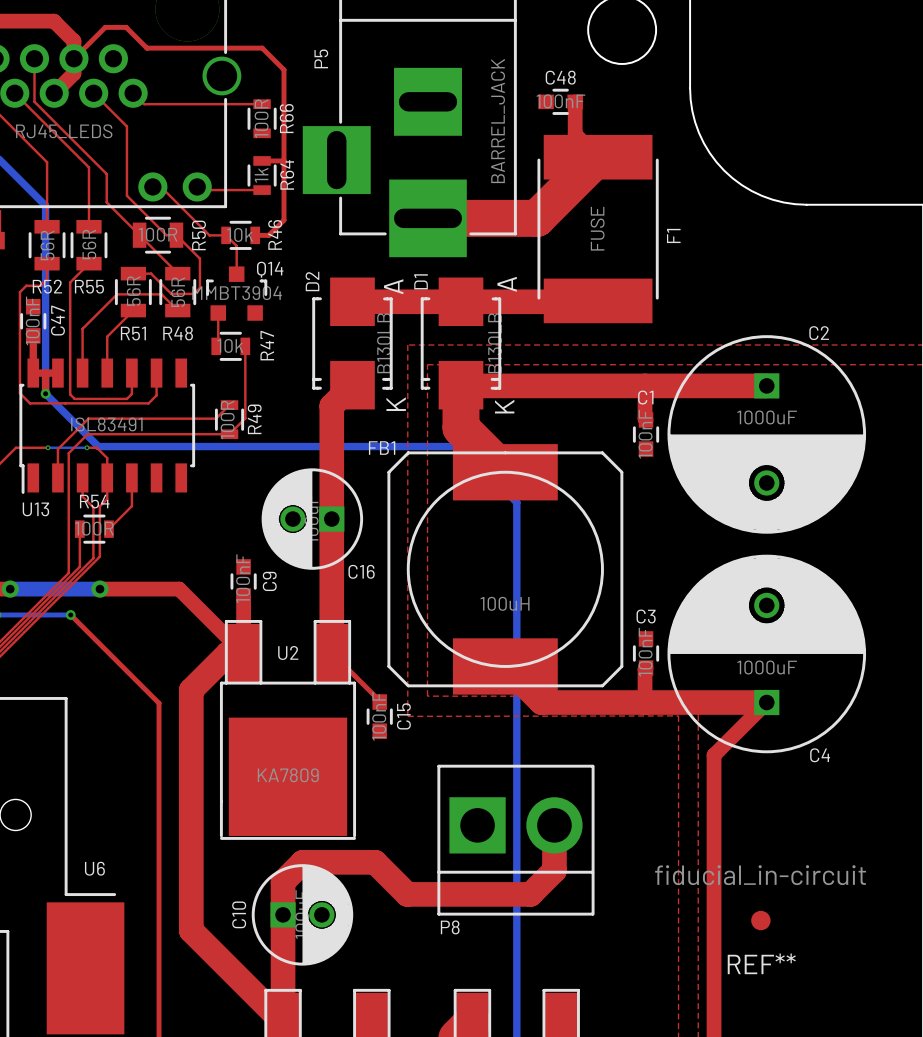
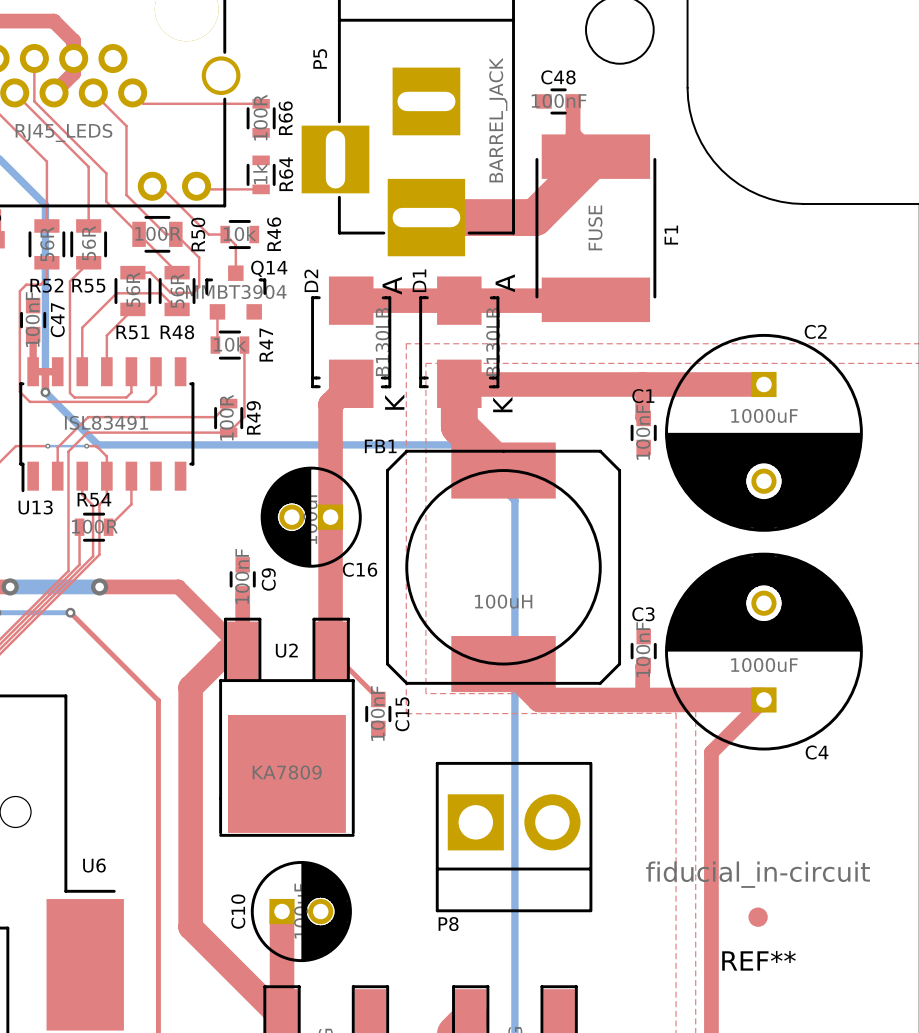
top track: (73, 58) (105, 27) (126, 27) (146, 48) (262, 48) (283, 69) (283, 220) (268, 235) (255, 235) -> none
top track: (262, 160) (283, 160) -> none
top track: (554, 825) (554, 870) (530, 894) (407, 894) (375, 862) (302, 862) (283, 882) (283, 914) -> none

